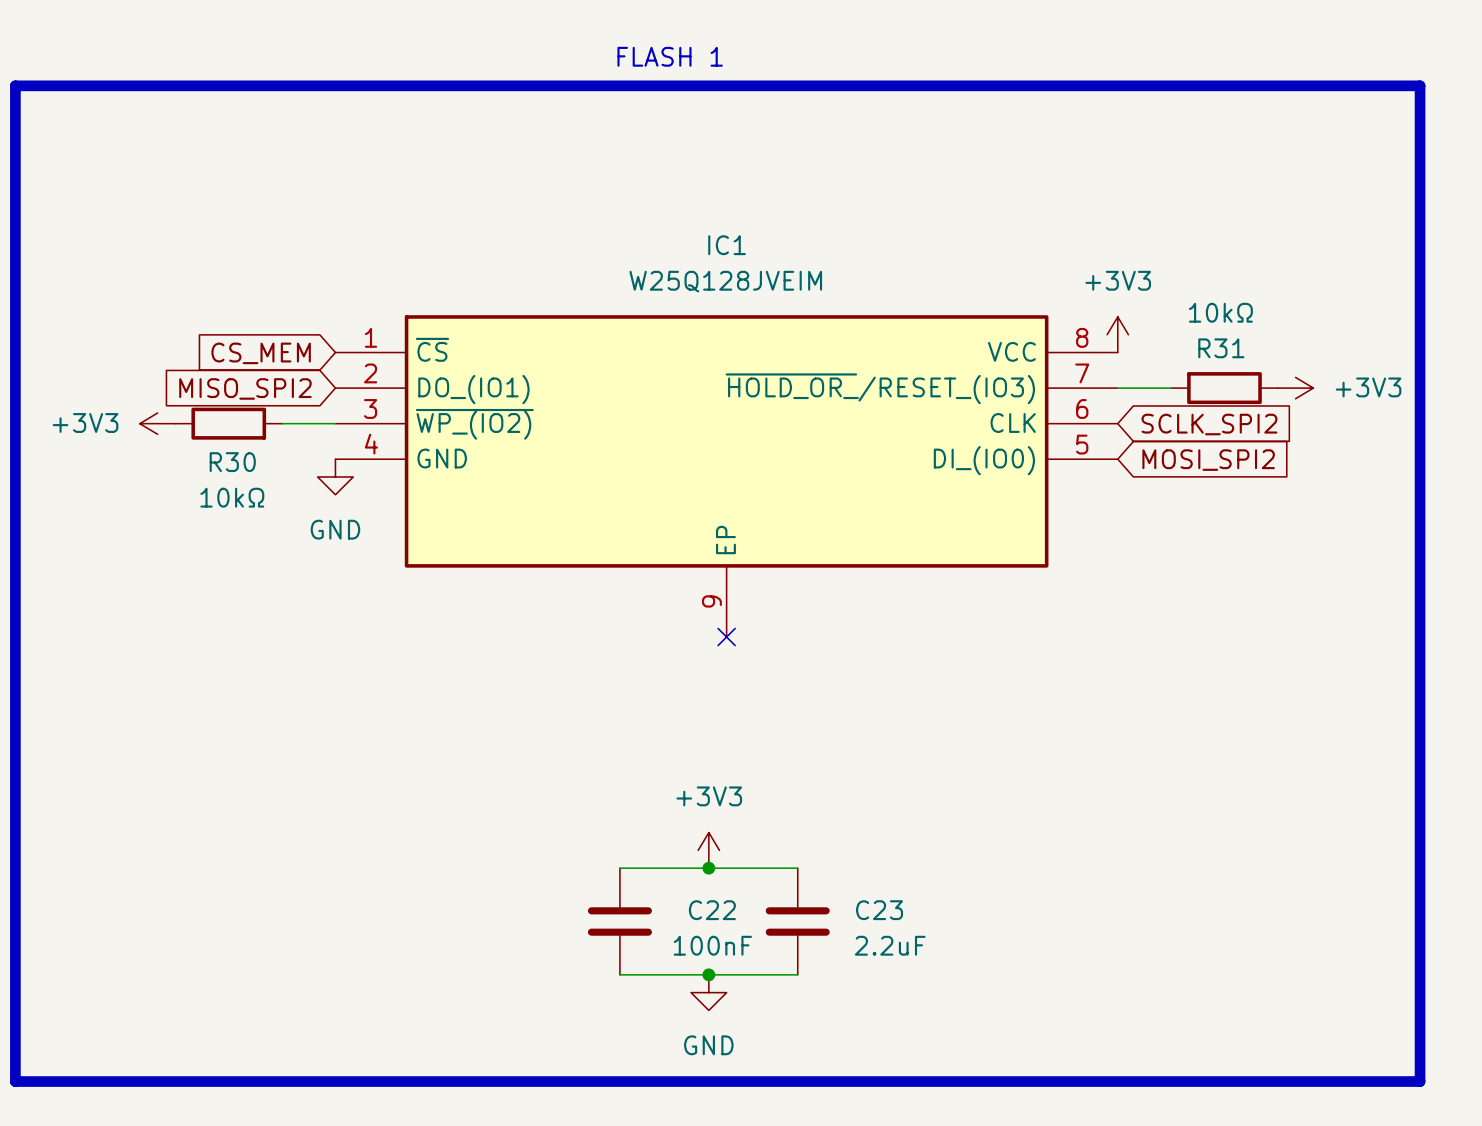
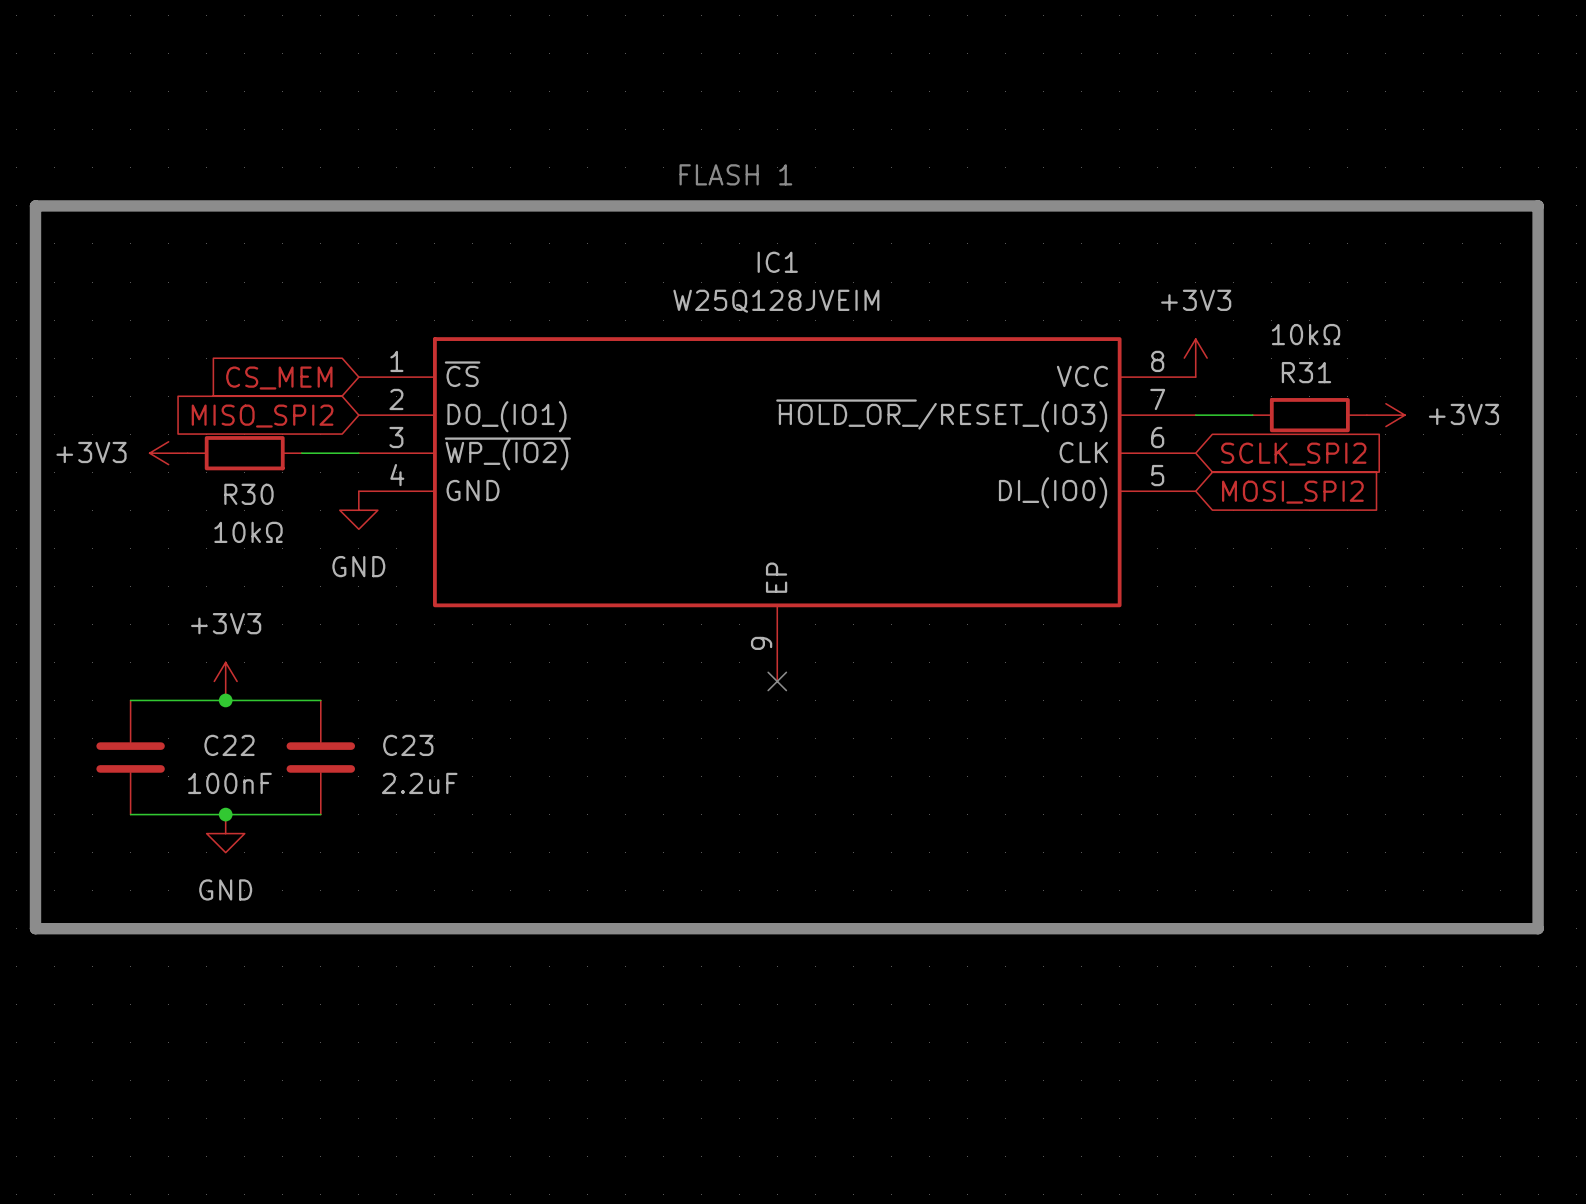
text position: FLASH 1 (670, 56) -> FLASH 1 (735, 174)
line: (15, 85) (1420, 85) (1420, 1081) (15, 1081) (15, 85) -> (35, 205) (35, 928) (1538, 928) (1538, 205) (35, 205)
power symbol: none -> +3V3 (225, 681)
wire: none -> (130, 700) (320, 700)
junction: none -> (225, 700)
wire: none -> (130, 814) (320, 814)
junction: none -> (225, 814)
power symbol: none -> GND (225, 833)
power symbol: +3V3 (708, 850) -> none
junction: (708, 868) -> none
C22 position: (619, 921) -> (130, 757)
C23 position: (797, 921) -> (320, 757)
wire: (619, 974) (797, 974) -> none
junction: (708, 974) -> none
power symbol: GND (708, 992) -> none

